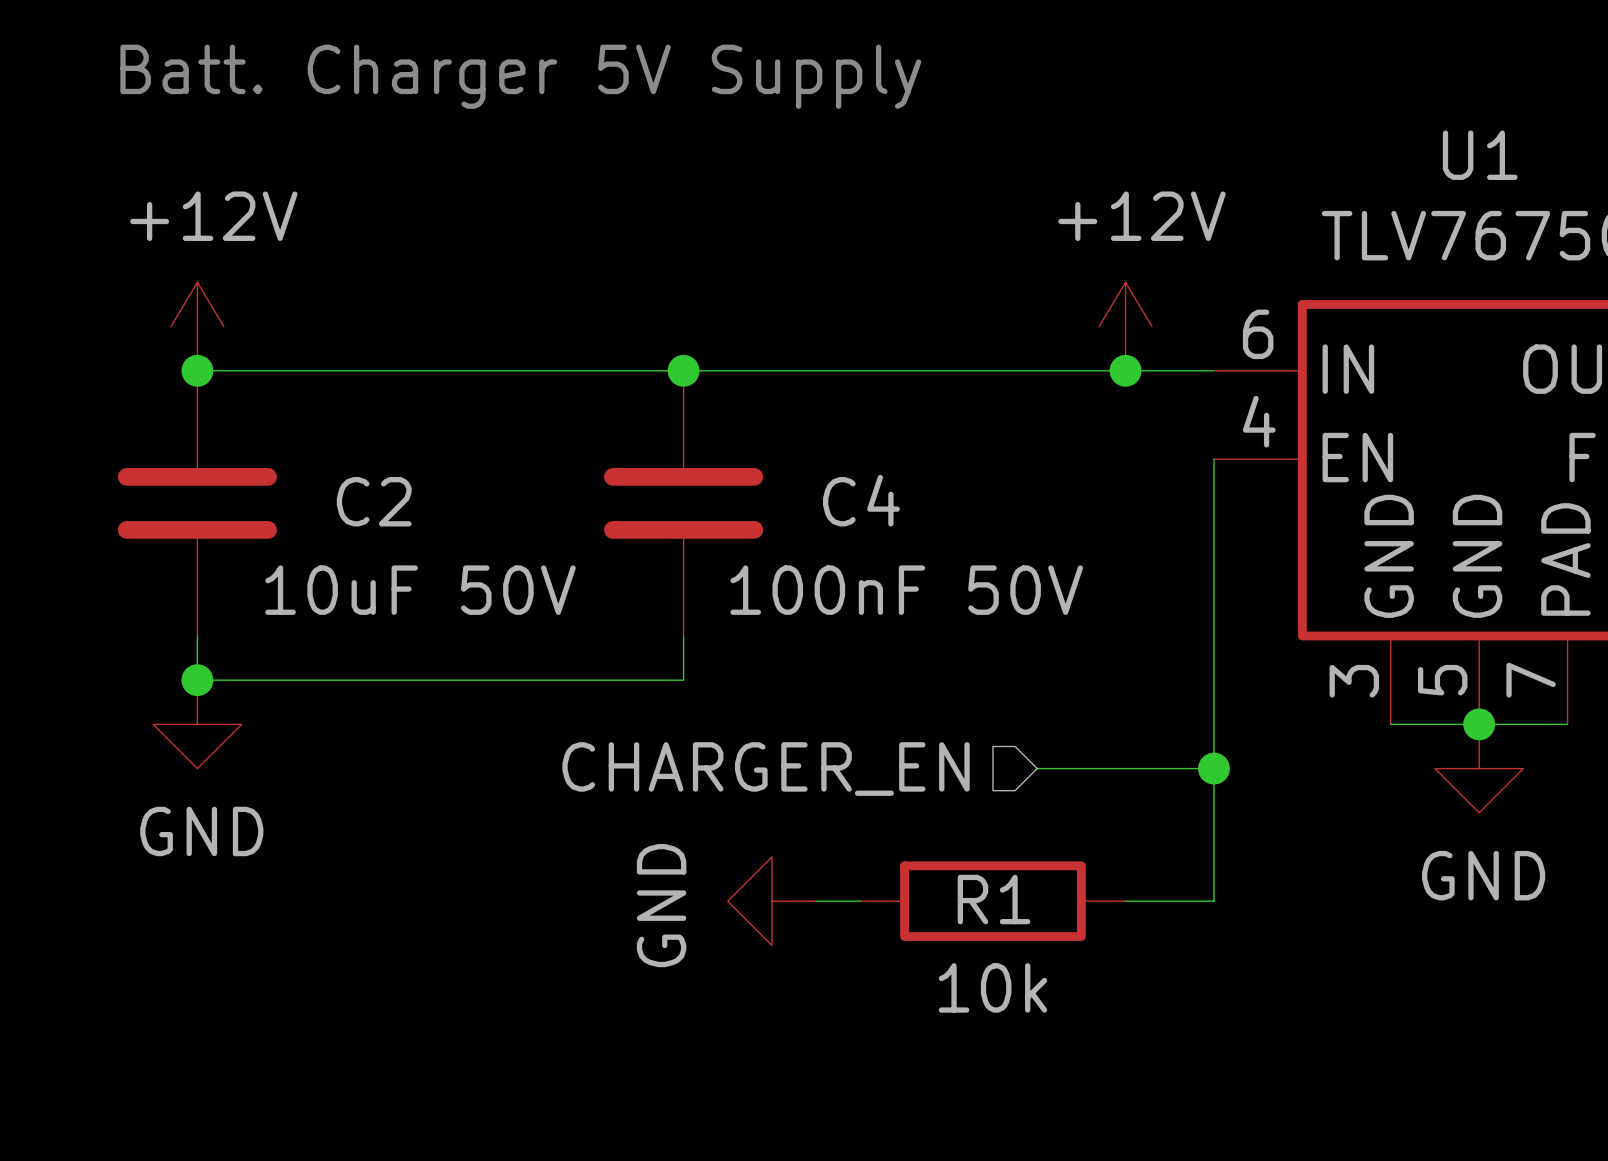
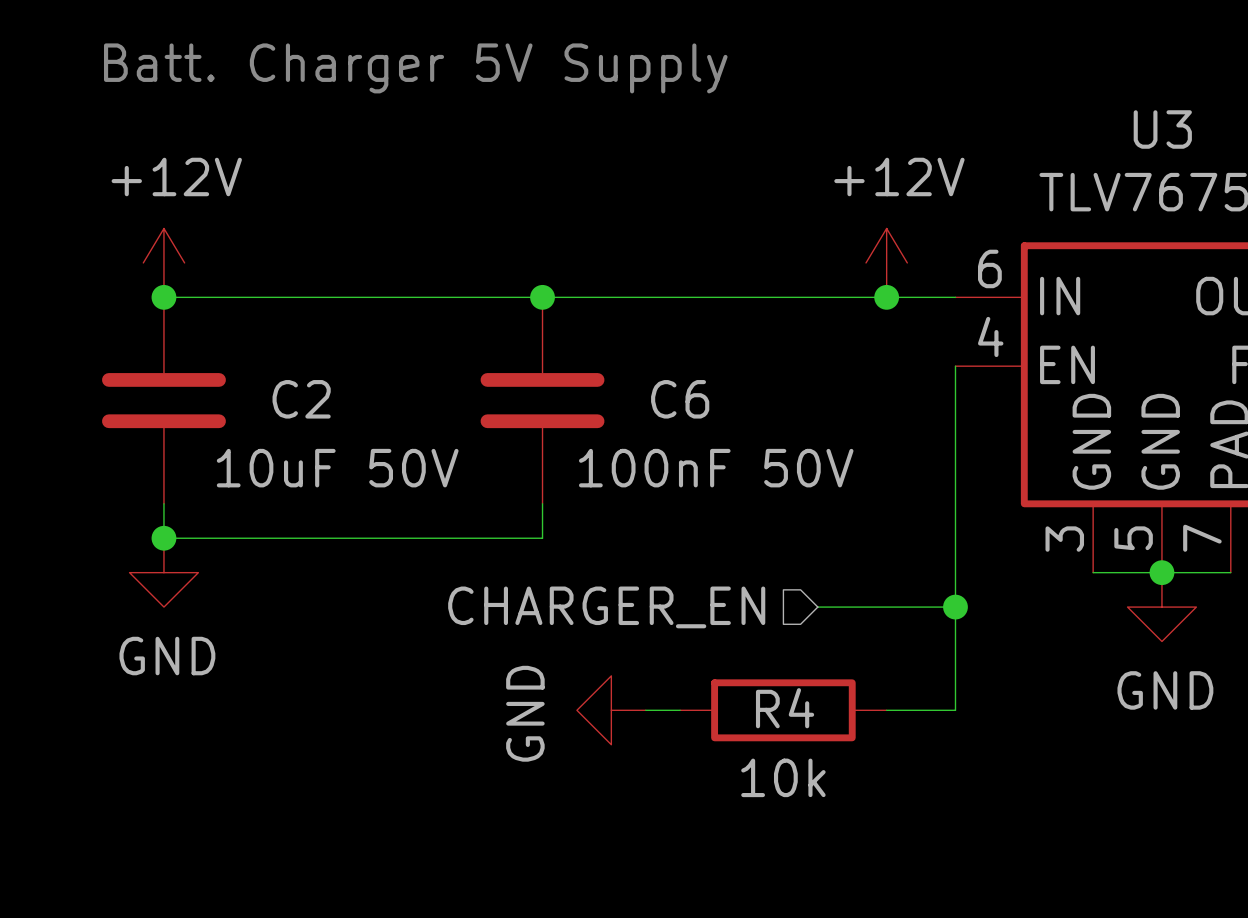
U1 name: U1 (1480, 155) -> U3 (1162, 129)
C4 name: C4 (861, 500) -> C6 (680, 399)
R1 name: R1 (994, 899) -> R4 (785, 708)

